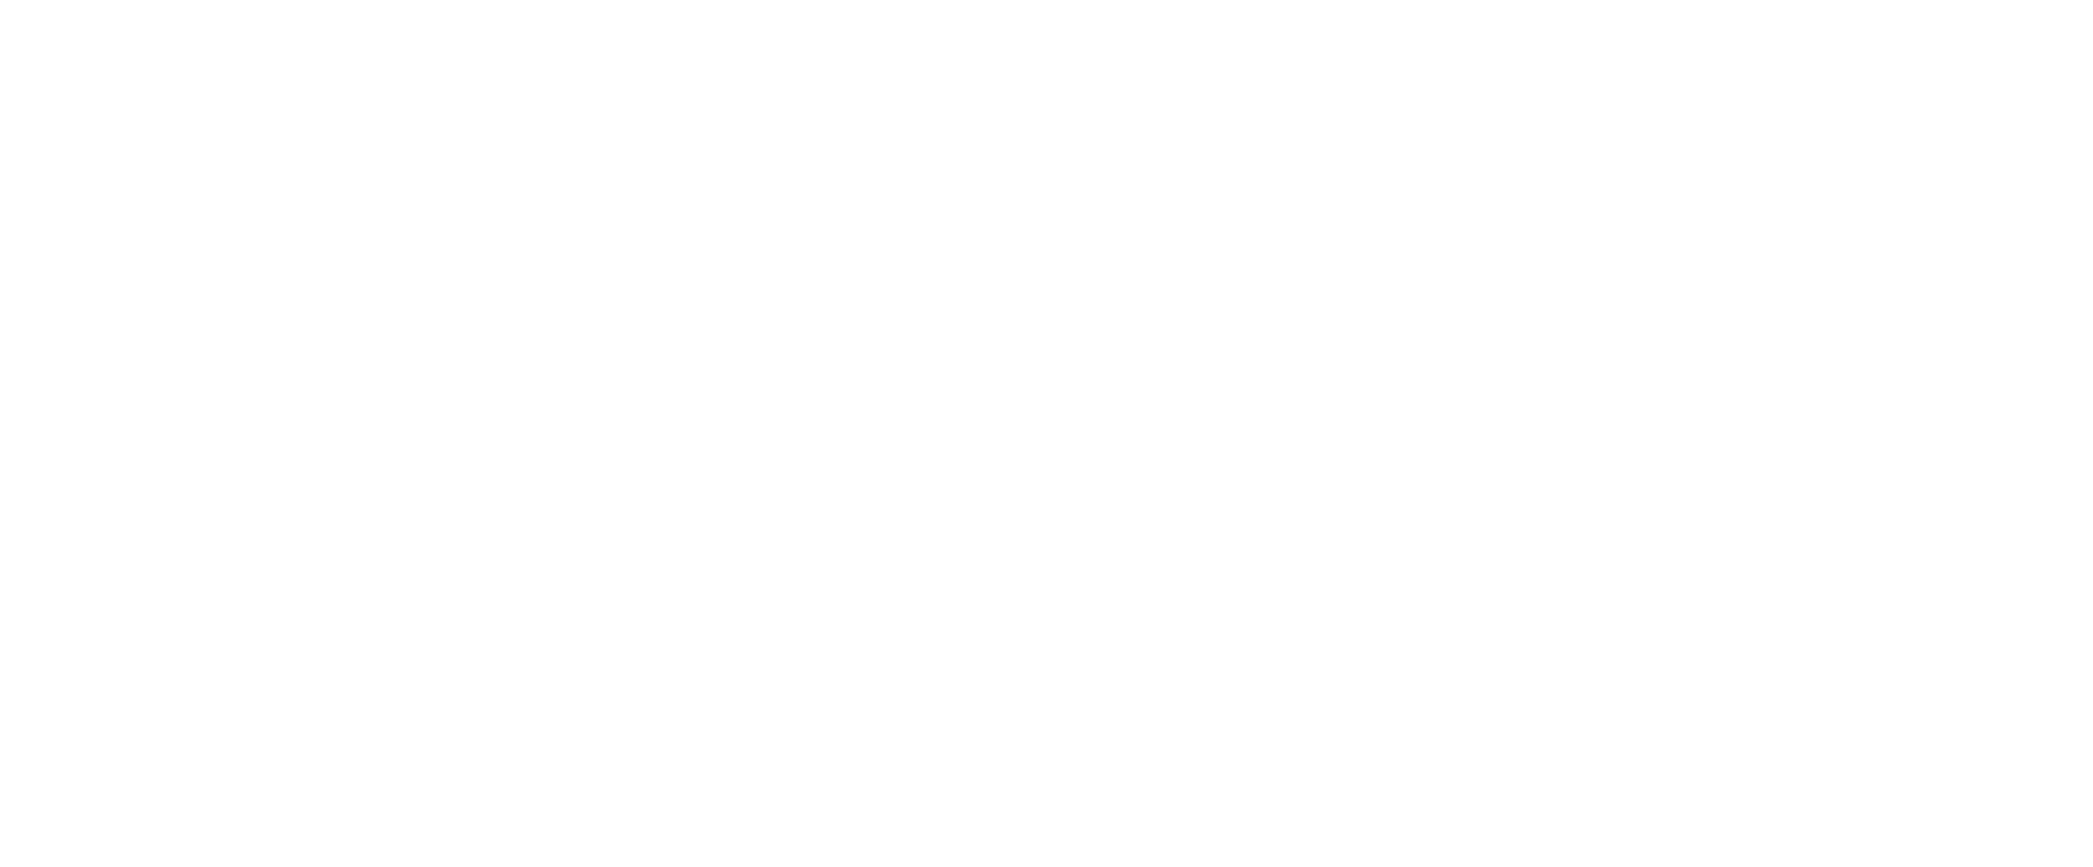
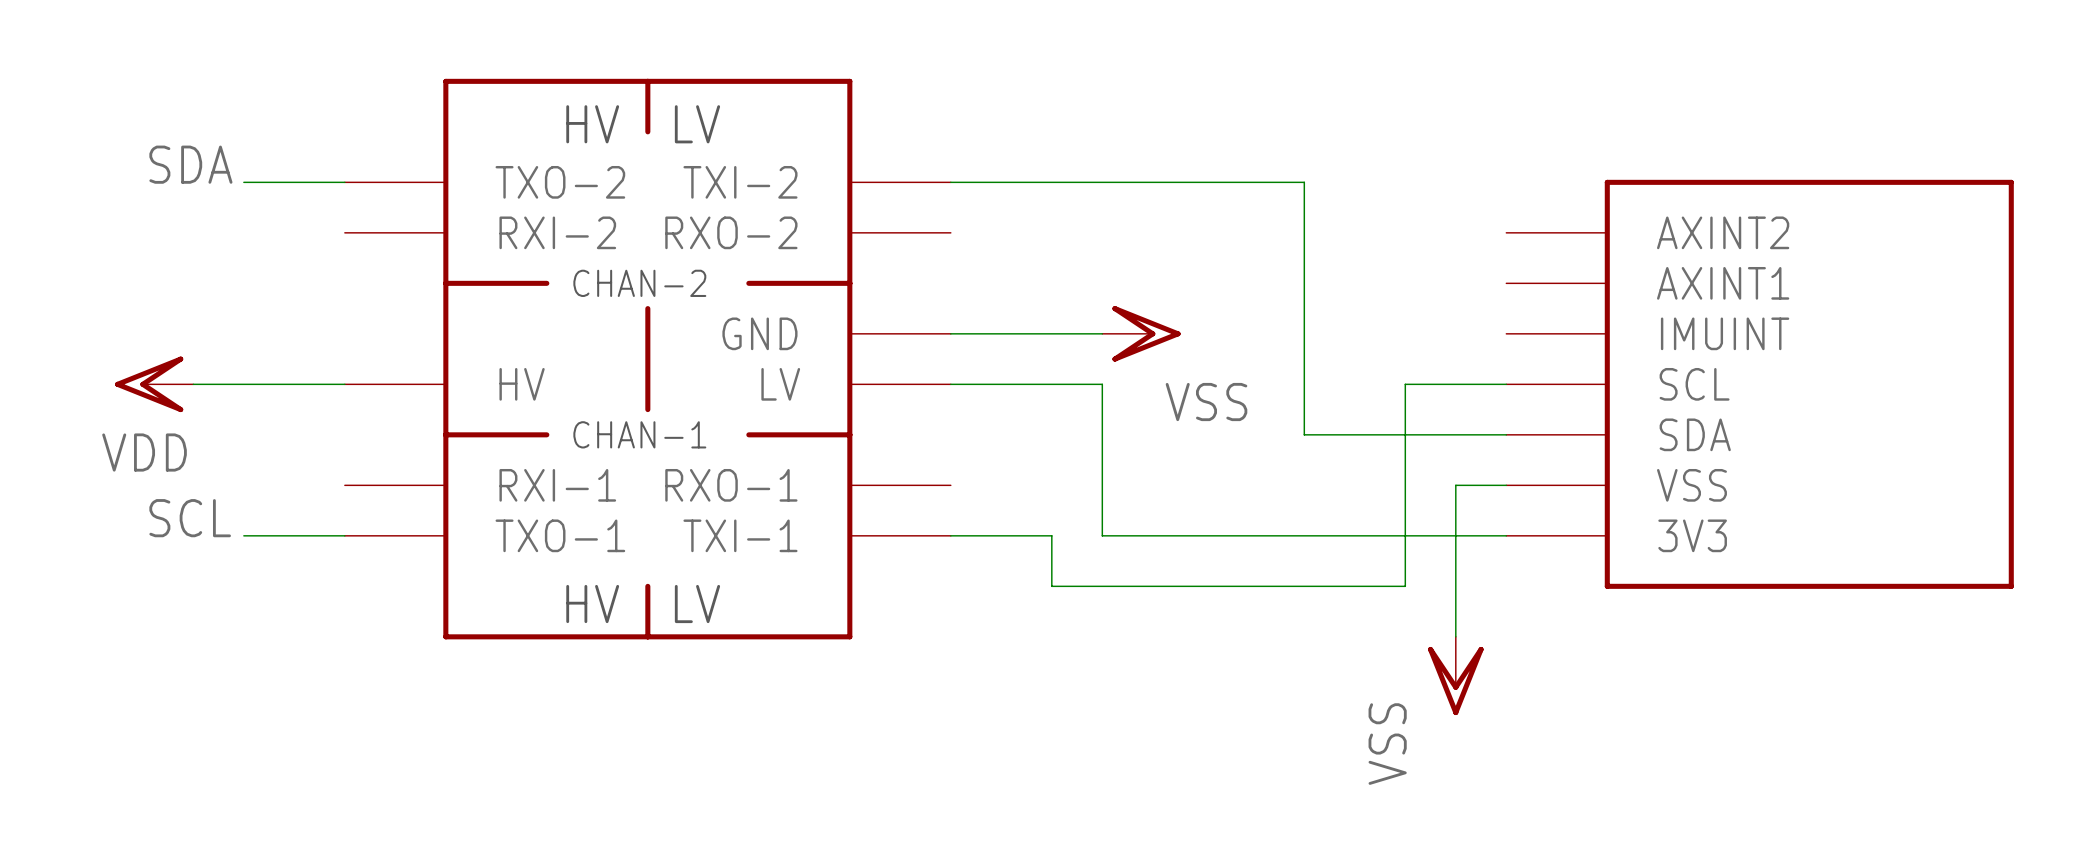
label: none -> SDA (190, 164)
wire: none -> (243, 182) (344, 182)
wire: none -> (950, 182) (1304, 182) (1304, 434) (1506, 434)
wire: none -> (950, 333) (1102, 333)
power symbol: none -> VSS (1141, 333)
part: none -> (647, 359)
power symbol: none -> VDD (154, 384)
wire: none -> (193, 384) (344, 384)
wire: none -> (950, 384) (1102, 384) (1102, 535) (1506, 535)
wire: none -> (1506, 384) (1405, 384) (1405, 586) (1051, 586) (1051, 535) (950, 535)
part: none -> (1760, 384)
wire: none -> (1506, 485) (1455, 485) (1455, 636)
label: none -> SCL (190, 518)
wire: none -> (243, 535) (344, 535)
power symbol: none -> VSS (1455, 675)

